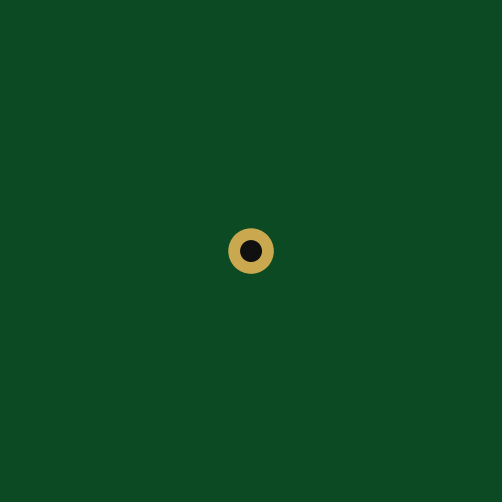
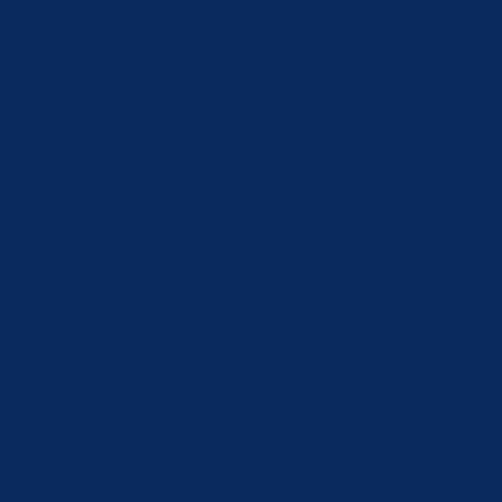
via: (251, 251) -> none

